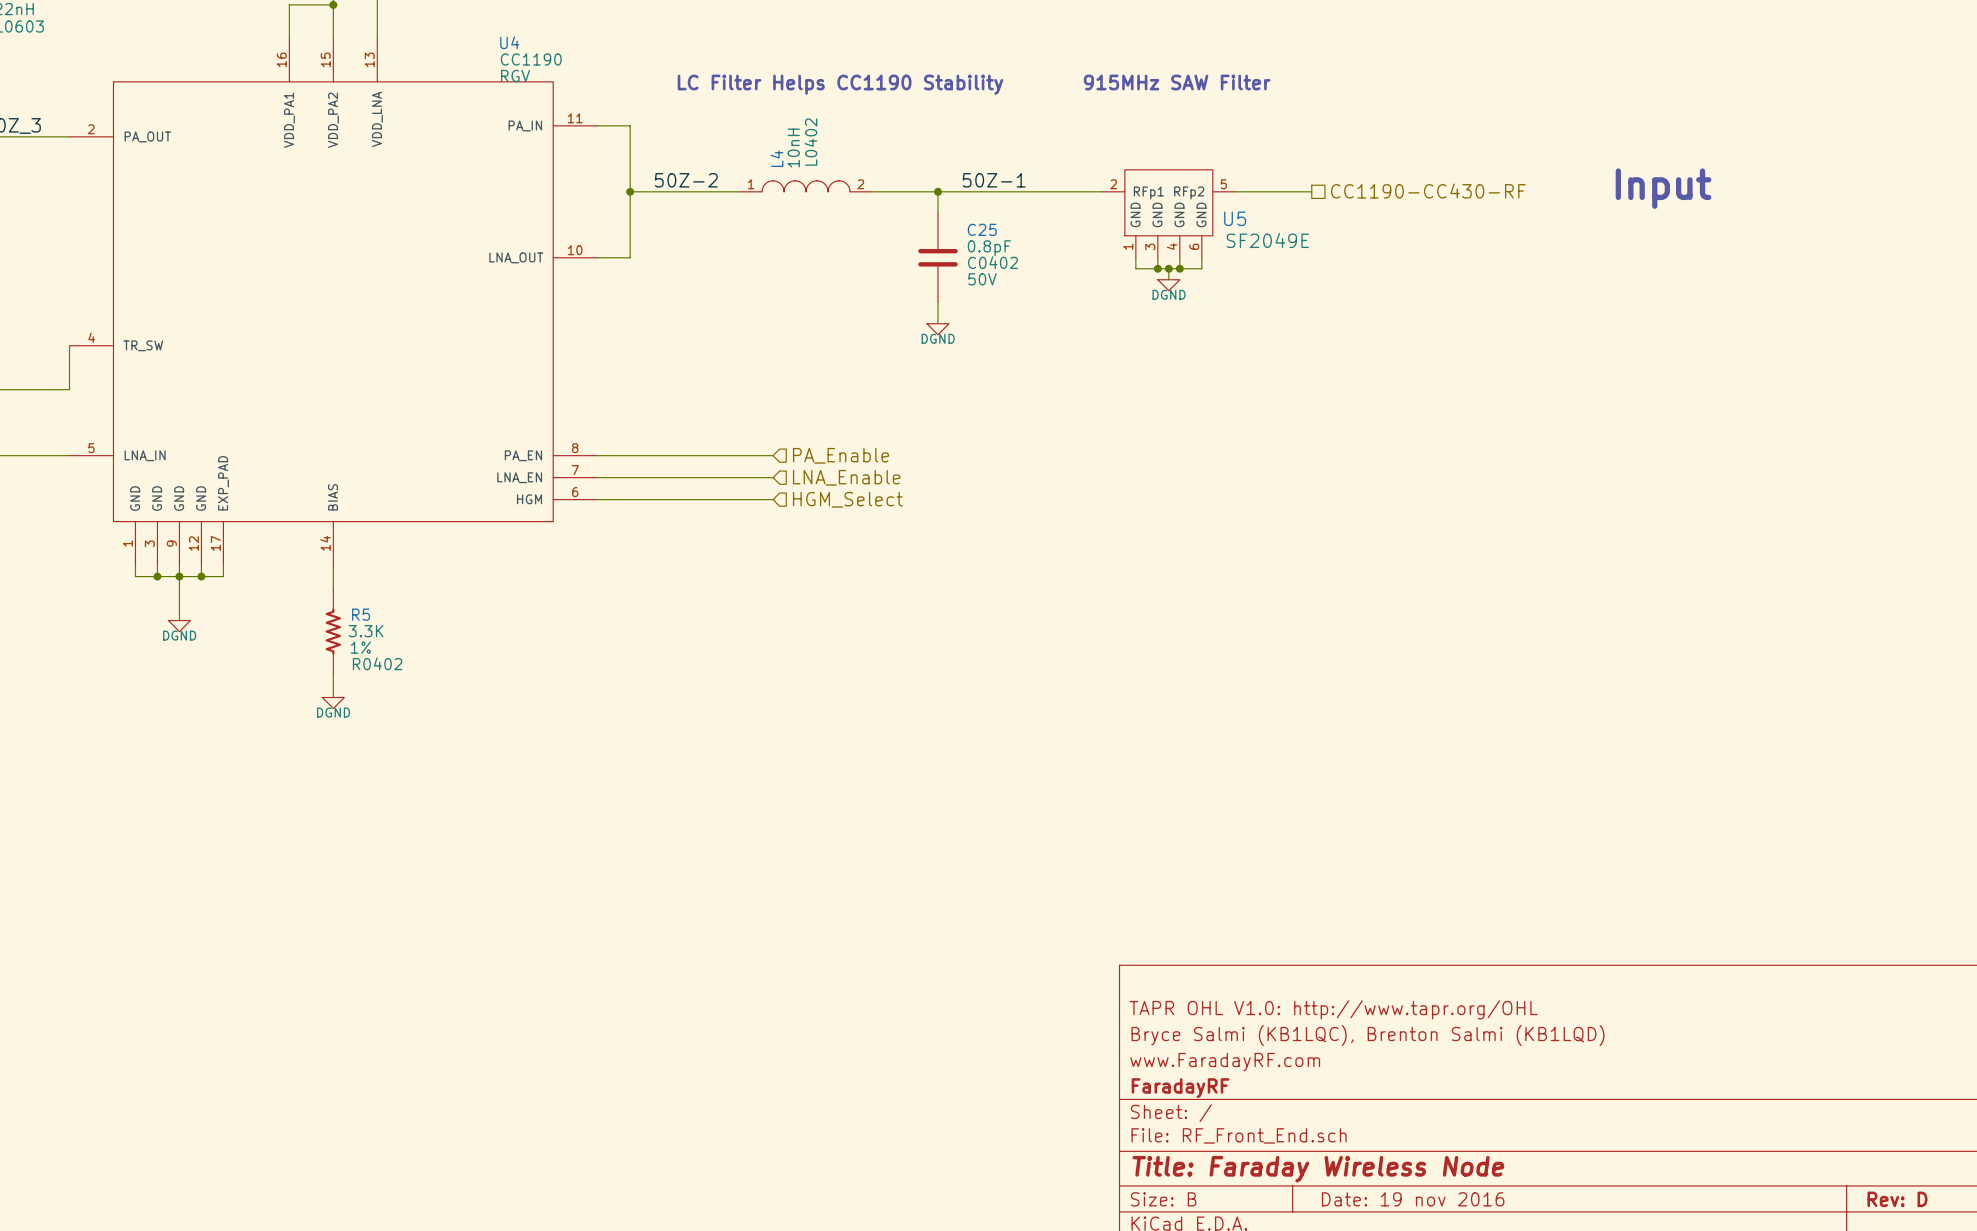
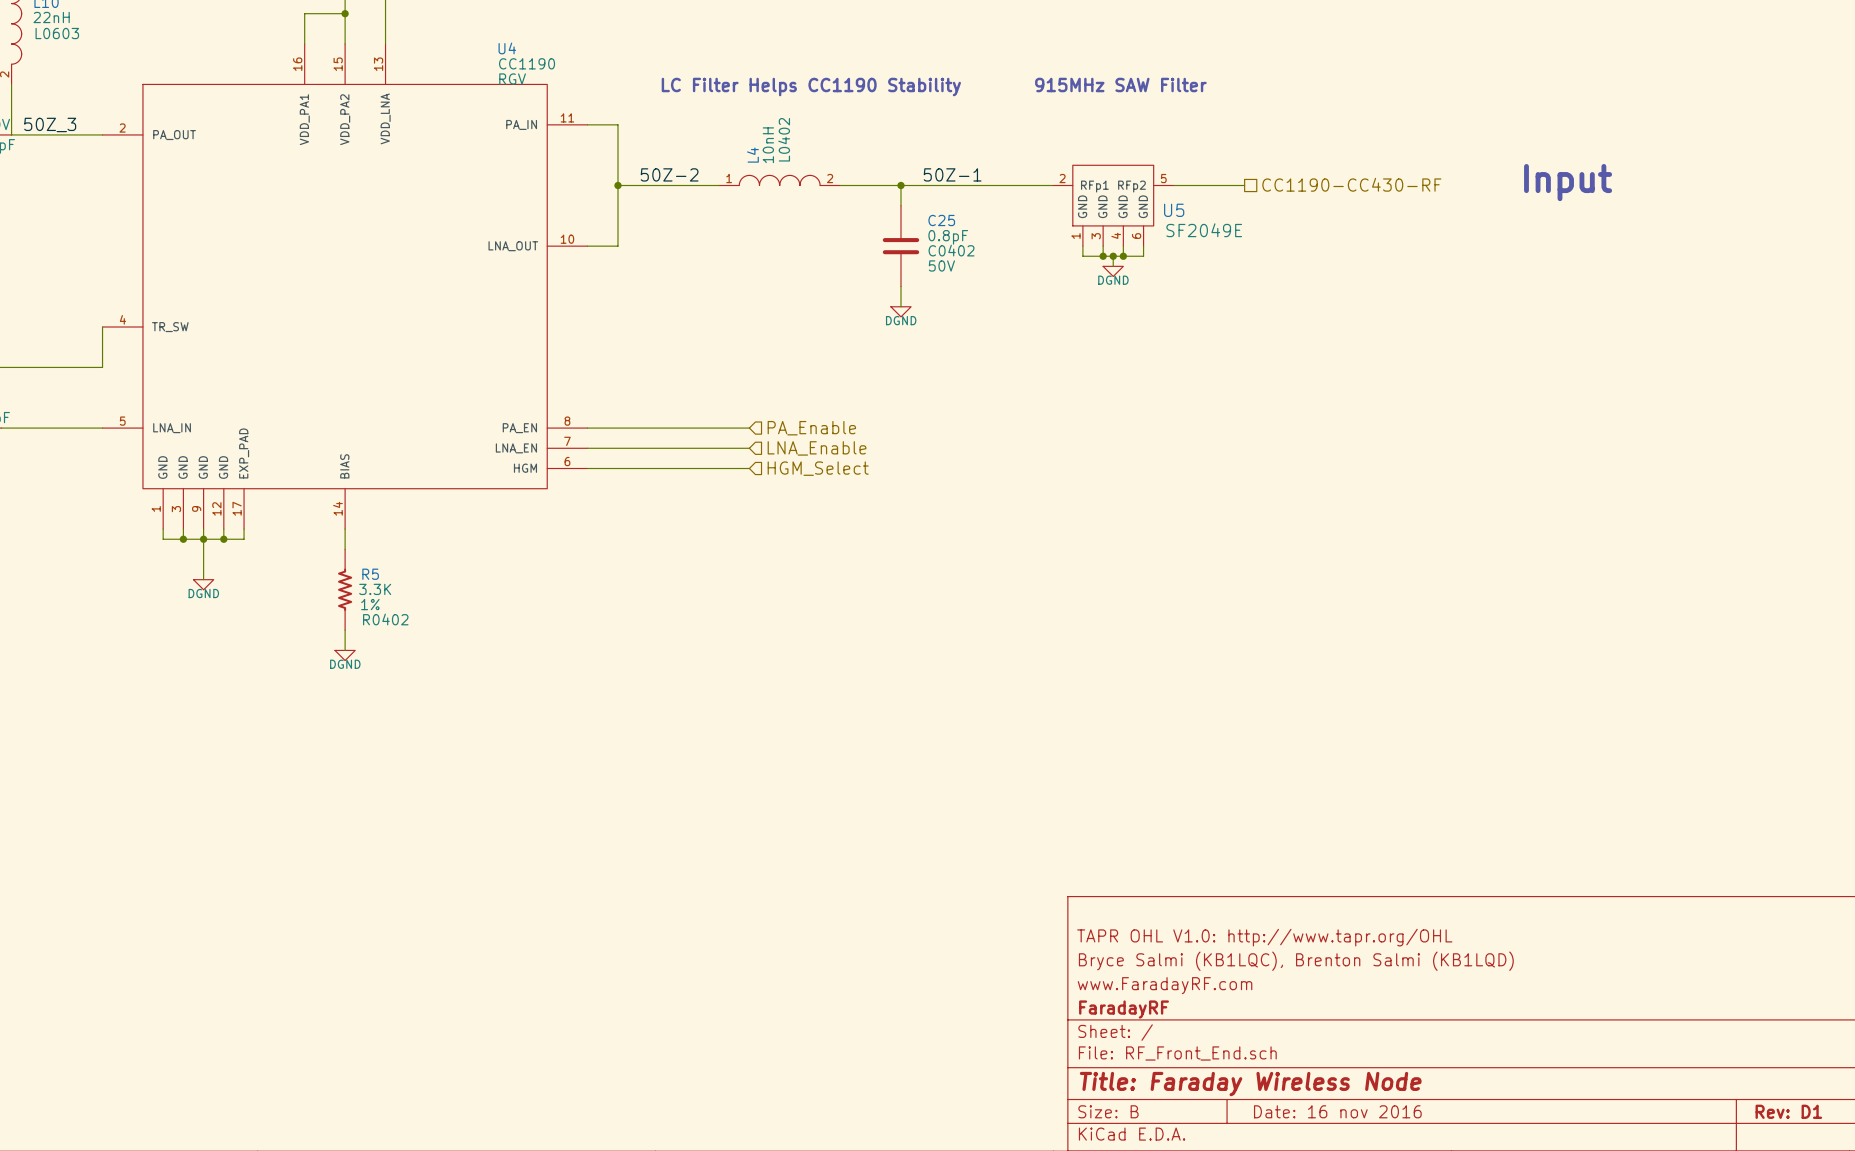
title block: Date: 19 nov 2016 (1413, 1199) -> Date: 16 nov 2016 (1337, 1111)
title block: Rev: D (1897, 1199) -> Rev: D1 (1788, 1111)

